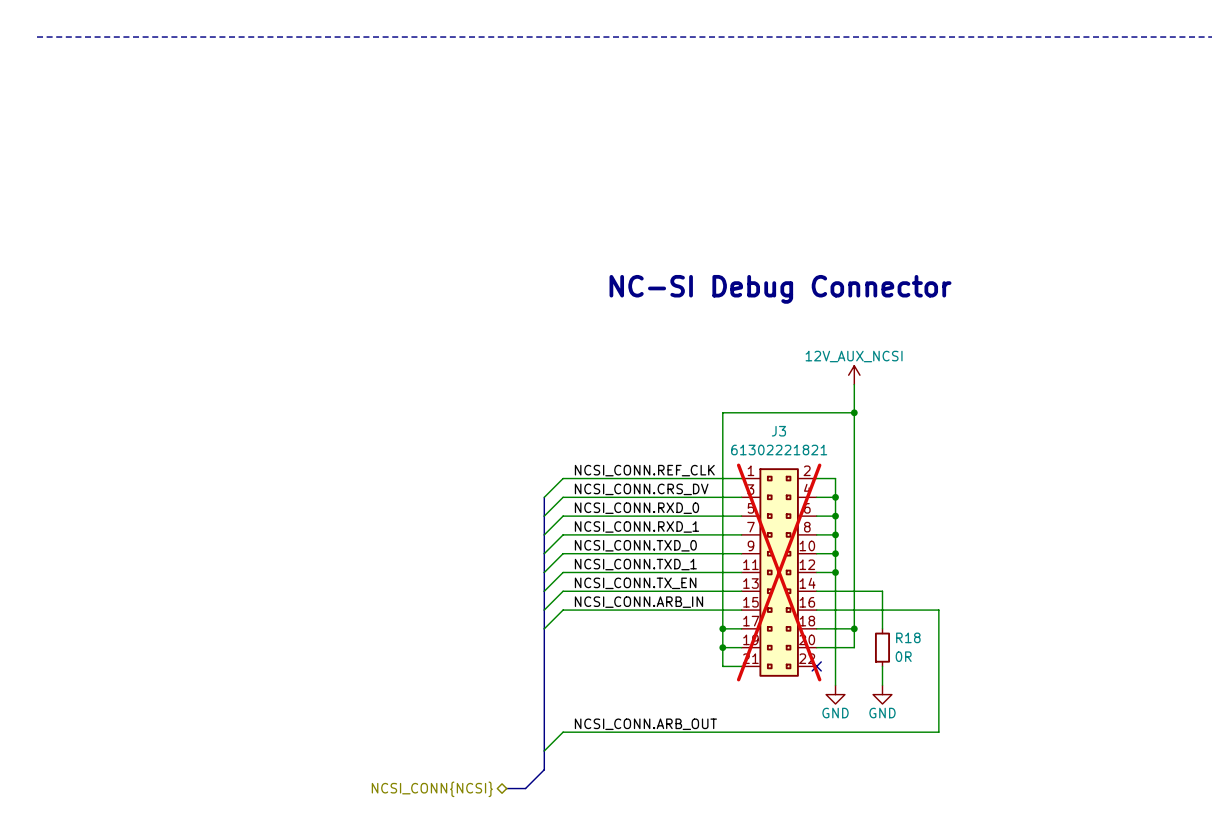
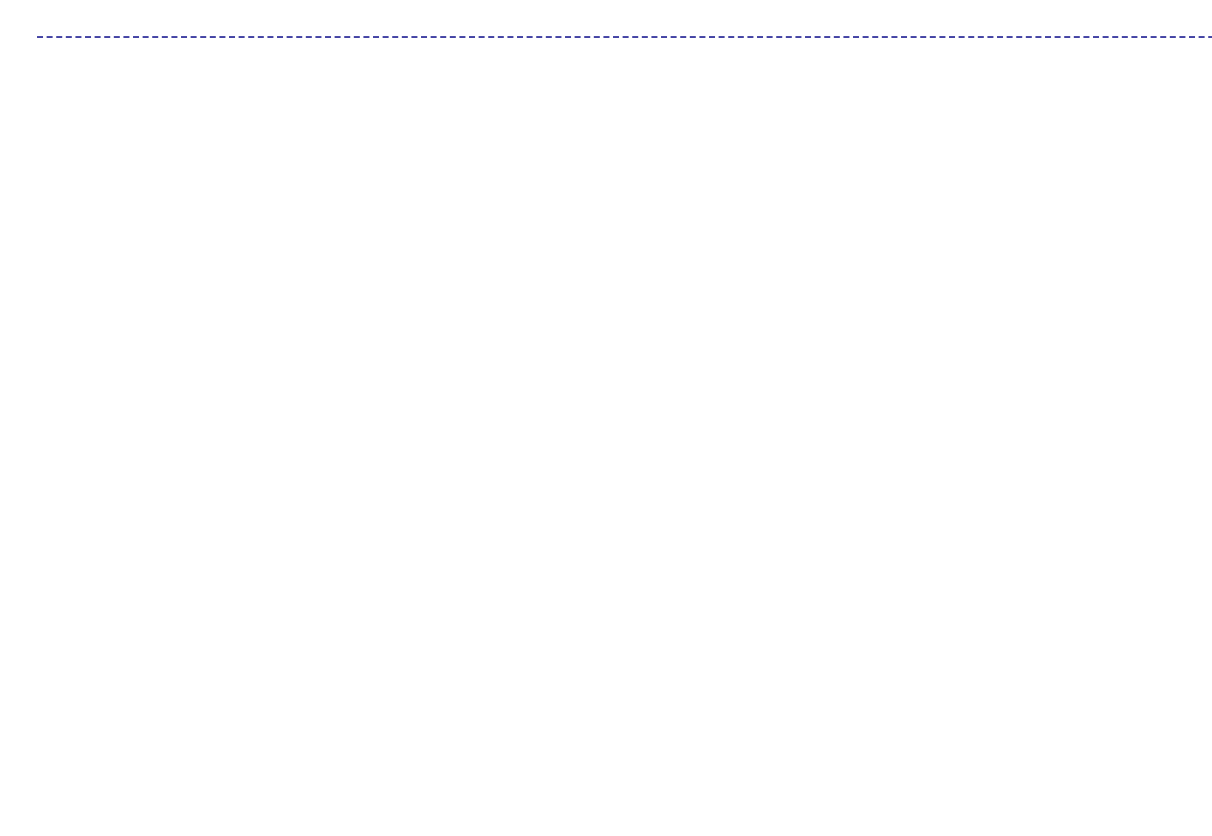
text: NC-SI Debug Connector (780, 289) -> none
power symbol: 12V_AUX_NCSI (854, 375) -> none
wire: (854, 384) (854, 647) (816, 647) -> none
wire: (854, 412) (722, 412) (722, 666) (741, 666) -> none
junction: (854, 412) -> none
label: NCSI_CONN.REF_CLK (644, 470) -> none
wire: (741, 478) (563, 478) (544, 497) -> none
wire: (816, 478) (835, 478) (835, 685) -> none
label: NCSI_CONN.CRS_DV (641, 489) -> none
bus: (544, 497) (544, 769) (525, 788) (506, 788) -> none
wire: (741, 497) (563, 497) (544, 516) -> none
wire: (816, 497) (835, 497) -> none
junction: (835, 497) -> none
label: NCSI_CONN.RXD_0 (636, 508) -> none
wire: (741, 516) (563, 516) (544, 534) -> none
wire: (816, 516) (835, 516) -> none
junction: (835, 516) -> none
label: NCSI_CONN.RXD_1 (636, 526) -> none
wire: (741, 534) (563, 534) (544, 553) -> none
wire: (816, 534) (835, 534) -> none
junction: (835, 534) -> none
label: NCSI_CONN.TXD_0 (635, 545) -> none
wire: (741, 553) (563, 553) (544, 572) -> none
wire: (816, 553) (835, 553) -> none
junction: (835, 553) -> none
label: NCSI_CONN.TXD_1 (635, 564) -> none
wire: (741, 572) (563, 572) (544, 591) -> none
J3: (779, 572) -> none
wire: (816, 572) (835, 572) -> none
junction: (835, 572) -> none
label: NCSI_CONN.TX_EN (635, 583) -> none
wire: (741, 591) (563, 591) (544, 610) -> none
wire: (816, 591) (882, 591) (882, 628) -> none
label: NCSI_CONN.ARB_IN (638, 602) -> none
wire: (741, 610) (563, 610) (544, 628) -> none
wire: (816, 610) (938, 610) (938, 732) (563, 732) (544, 750) -> none
wire: (722, 628) (741, 628) -> none
junction: (722, 628) -> none
wire: (816, 628) (854, 628) -> none
junction: (854, 628) -> none
wire: (722, 647) (741, 647) -> none
junction: (722, 647) -> none
R18: (882, 647) -> none
no-connect mark: (816, 666) -> none
wire: (882, 666) (882, 685) -> none
power symbol: GND (835, 694) -> none
power symbol: GND (882, 694) -> none
label: NCSI_CONN.ARB_OUT (645, 724) -> none
hierarchical label: NCSI_CONN{NCSI} (432, 789) -> none

